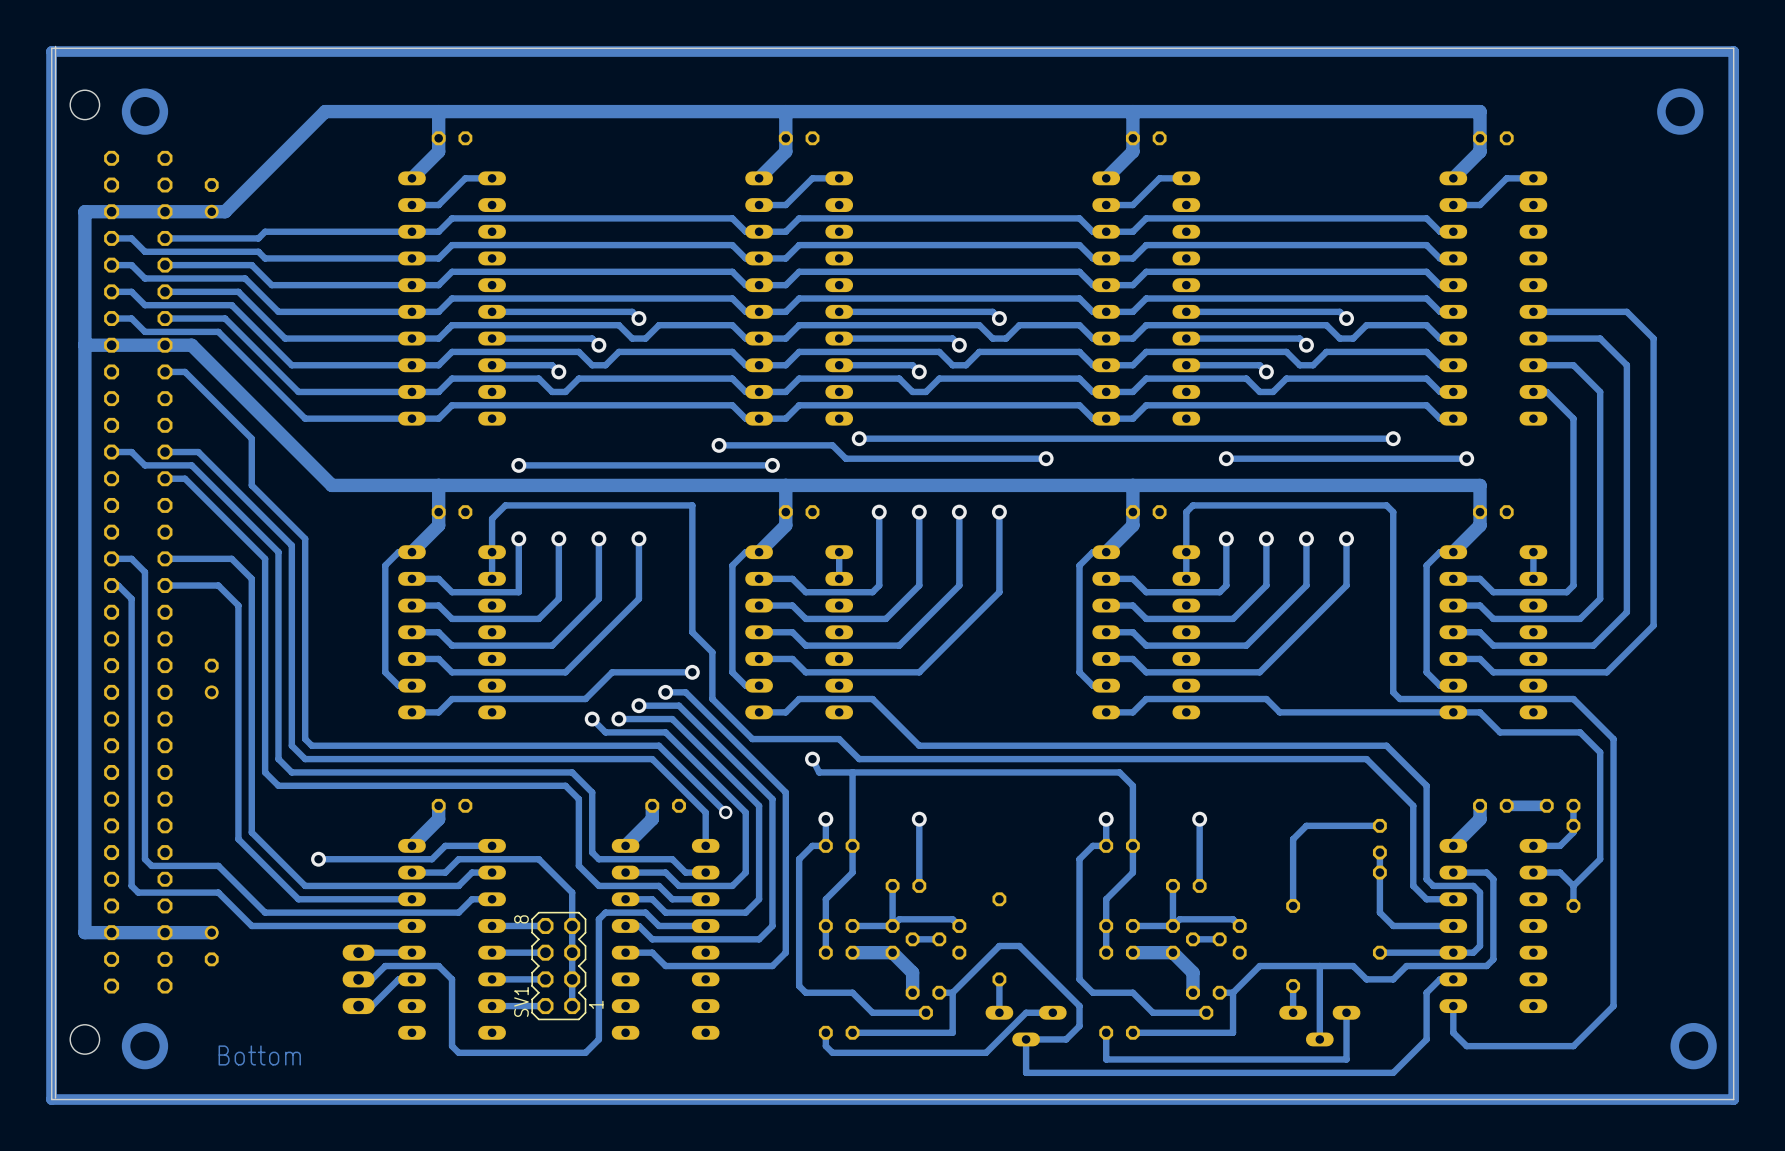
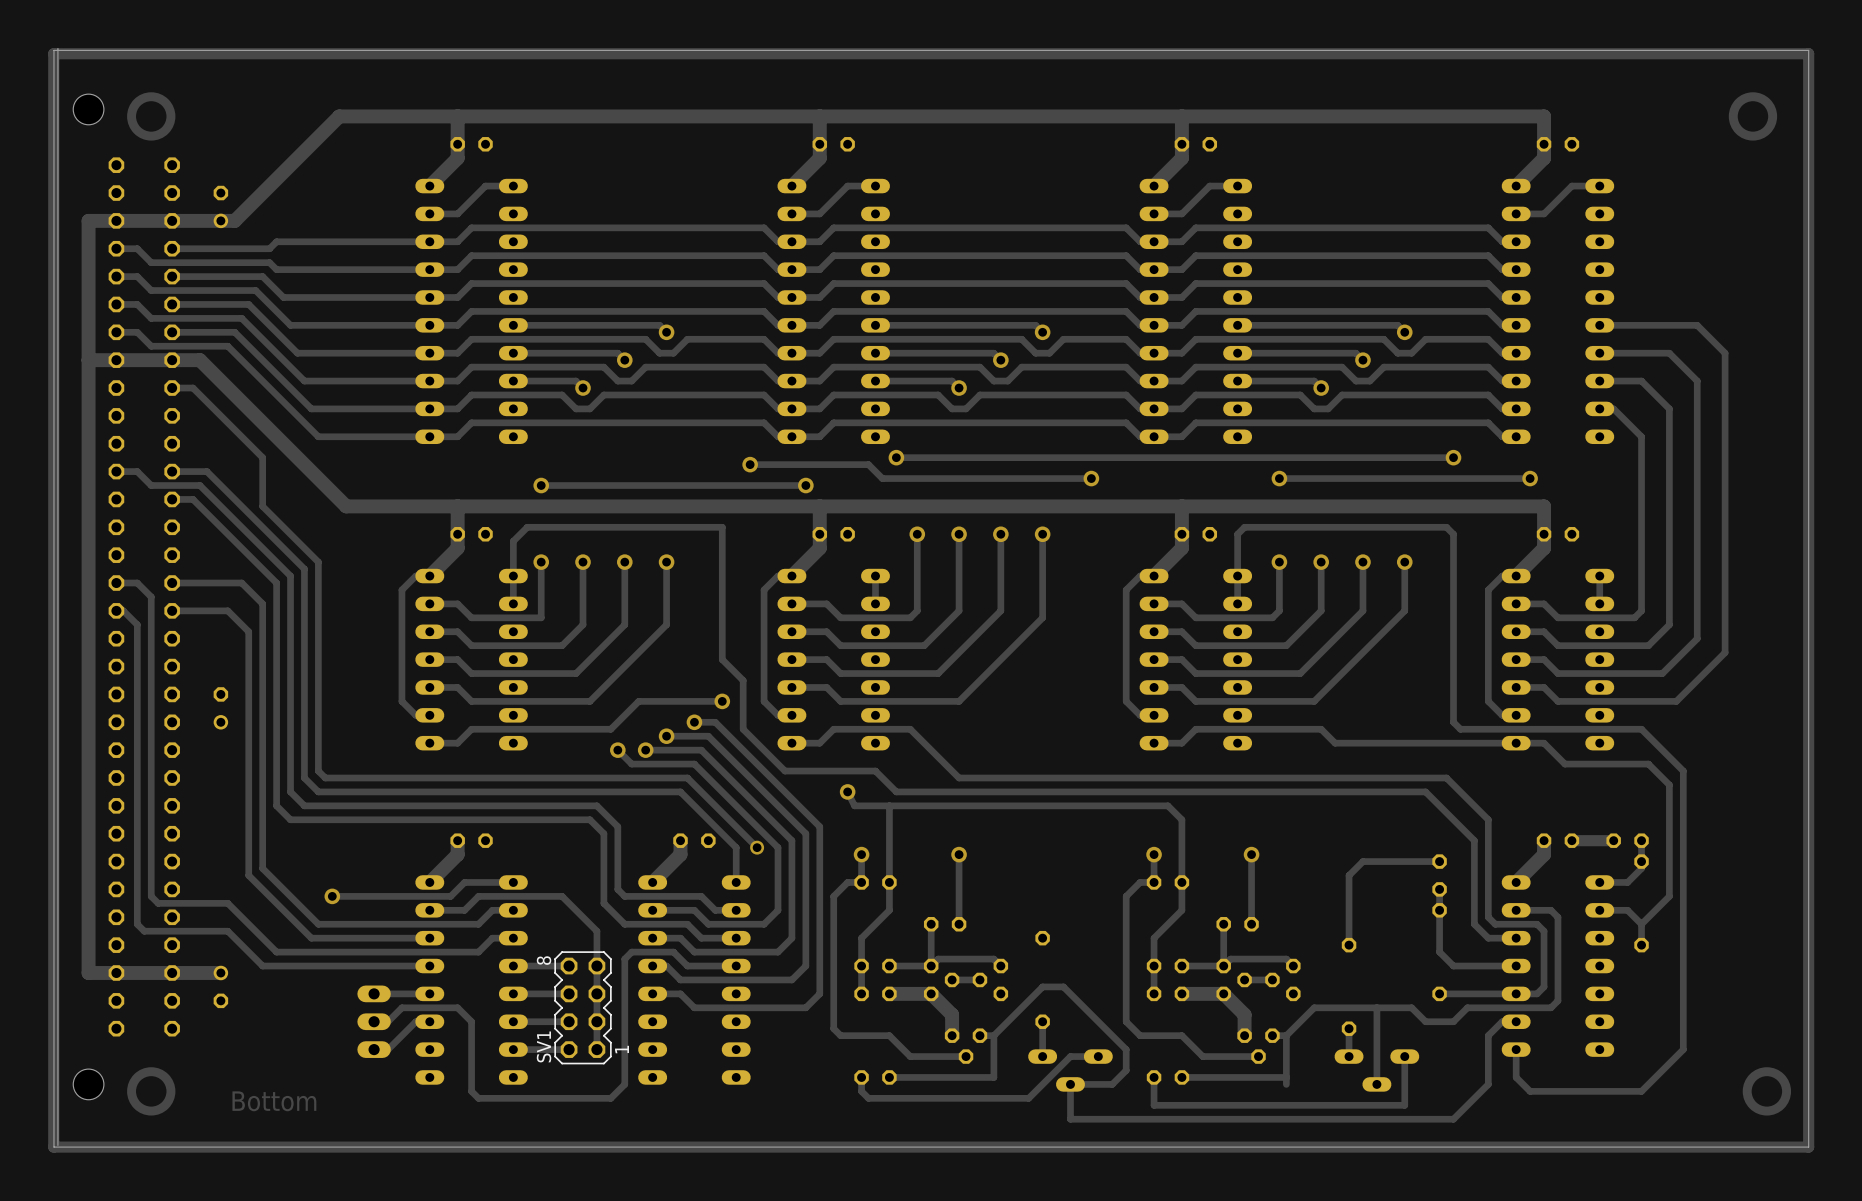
track: none -> (1286, 1077) (1286, 1084)

